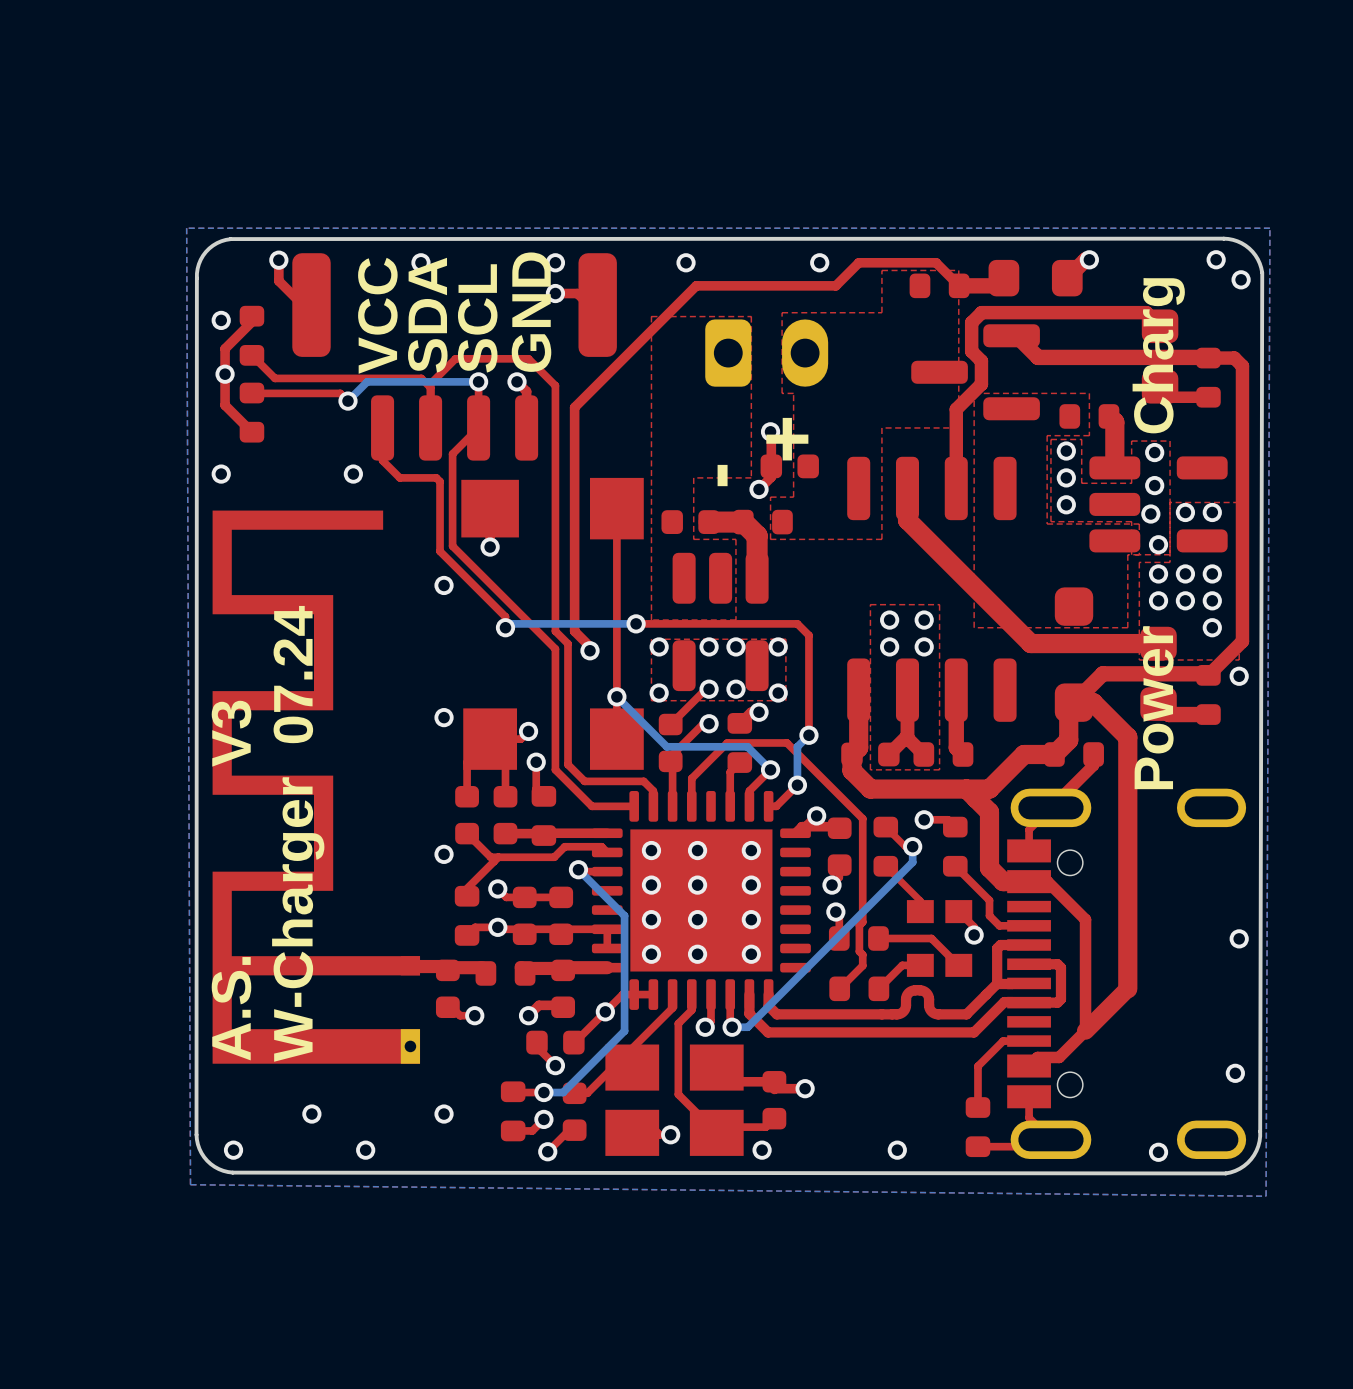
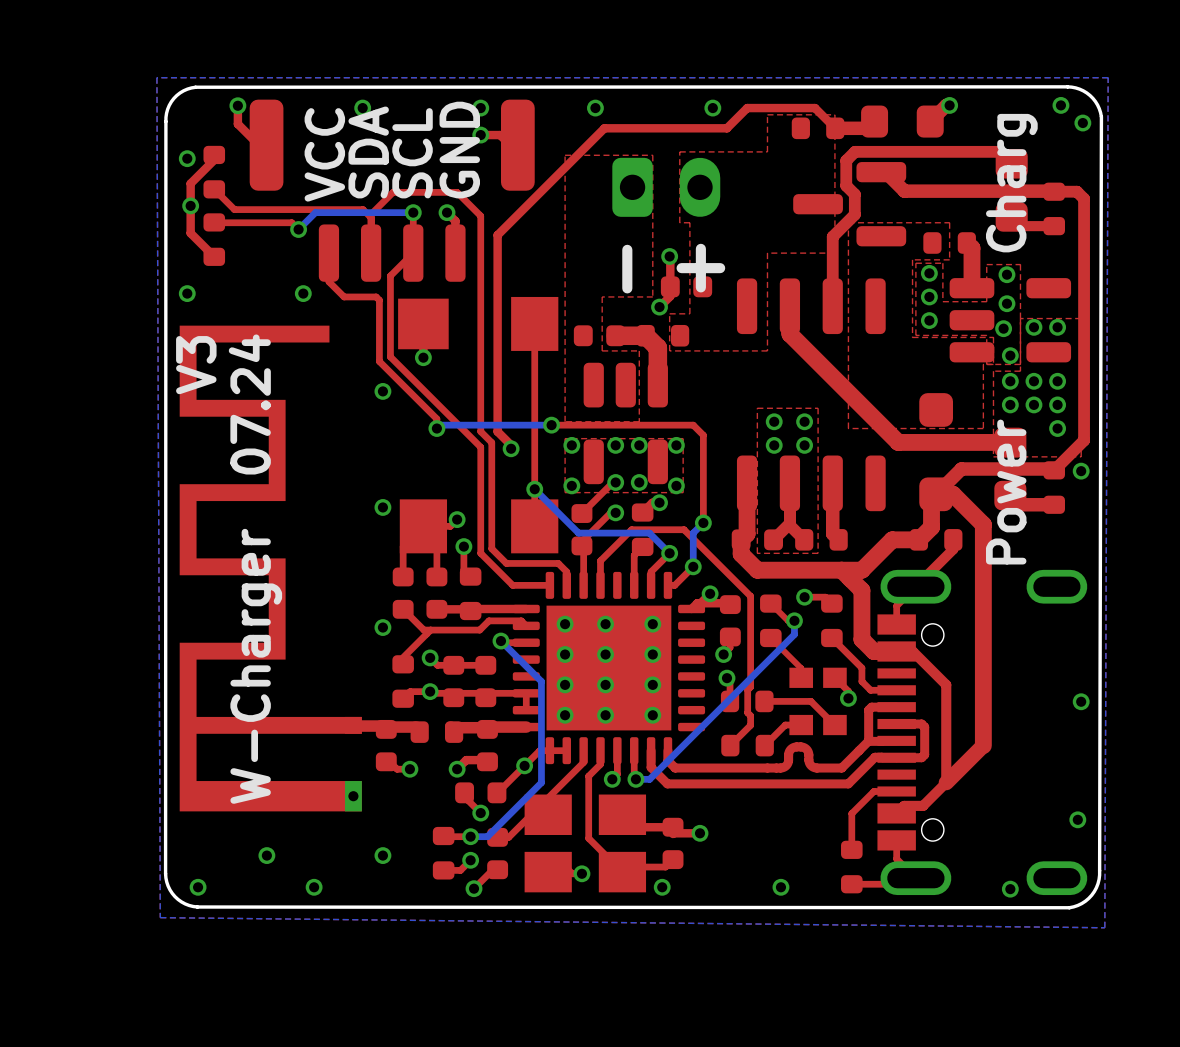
text: A.S. V3 (231, 880) -> V3 (196, 365)

